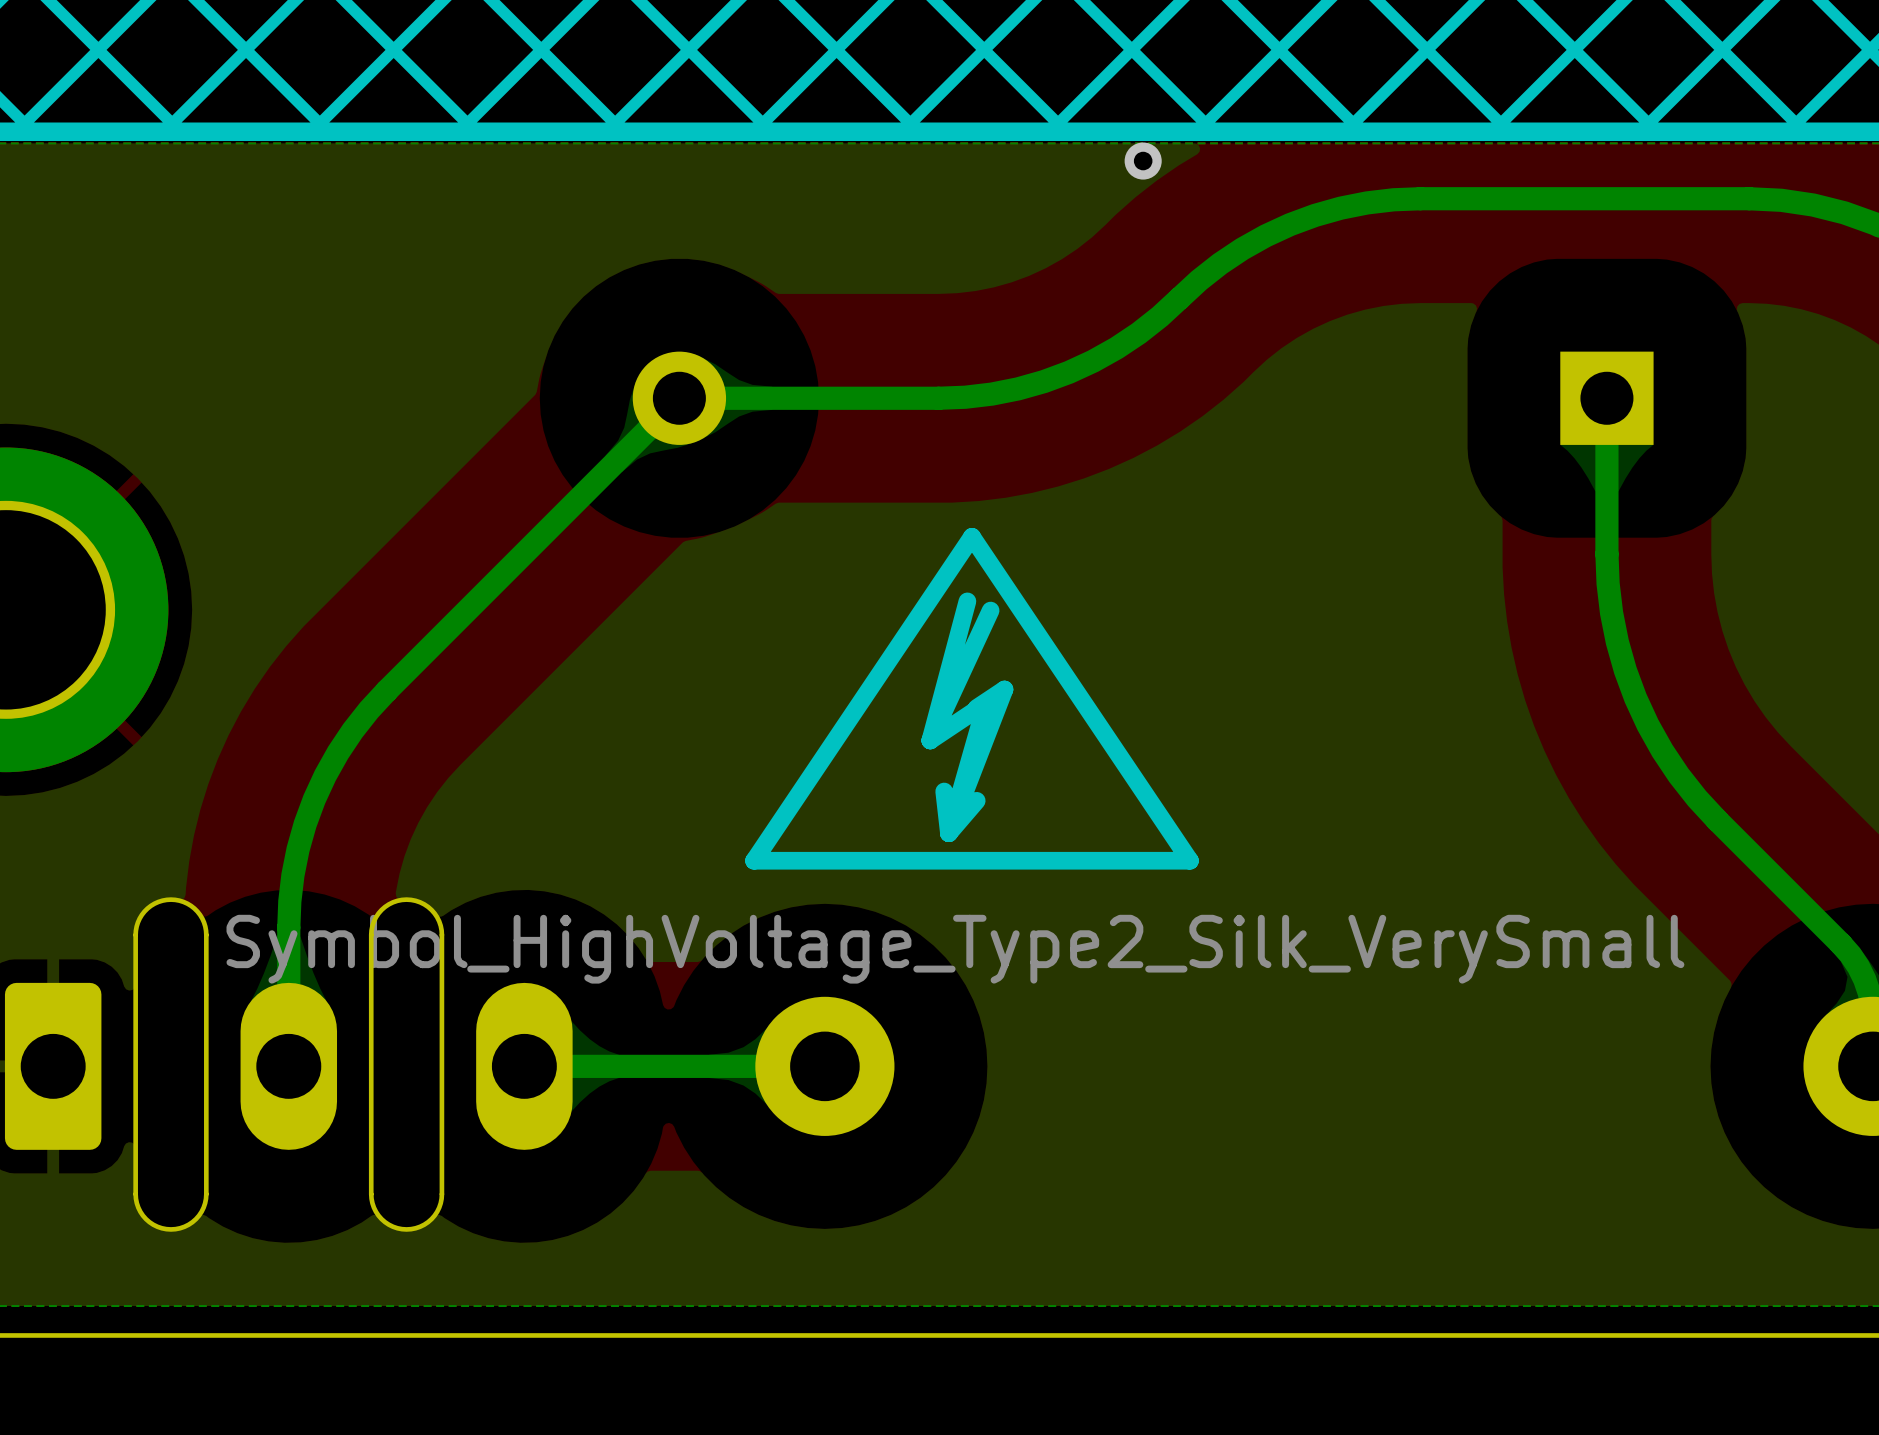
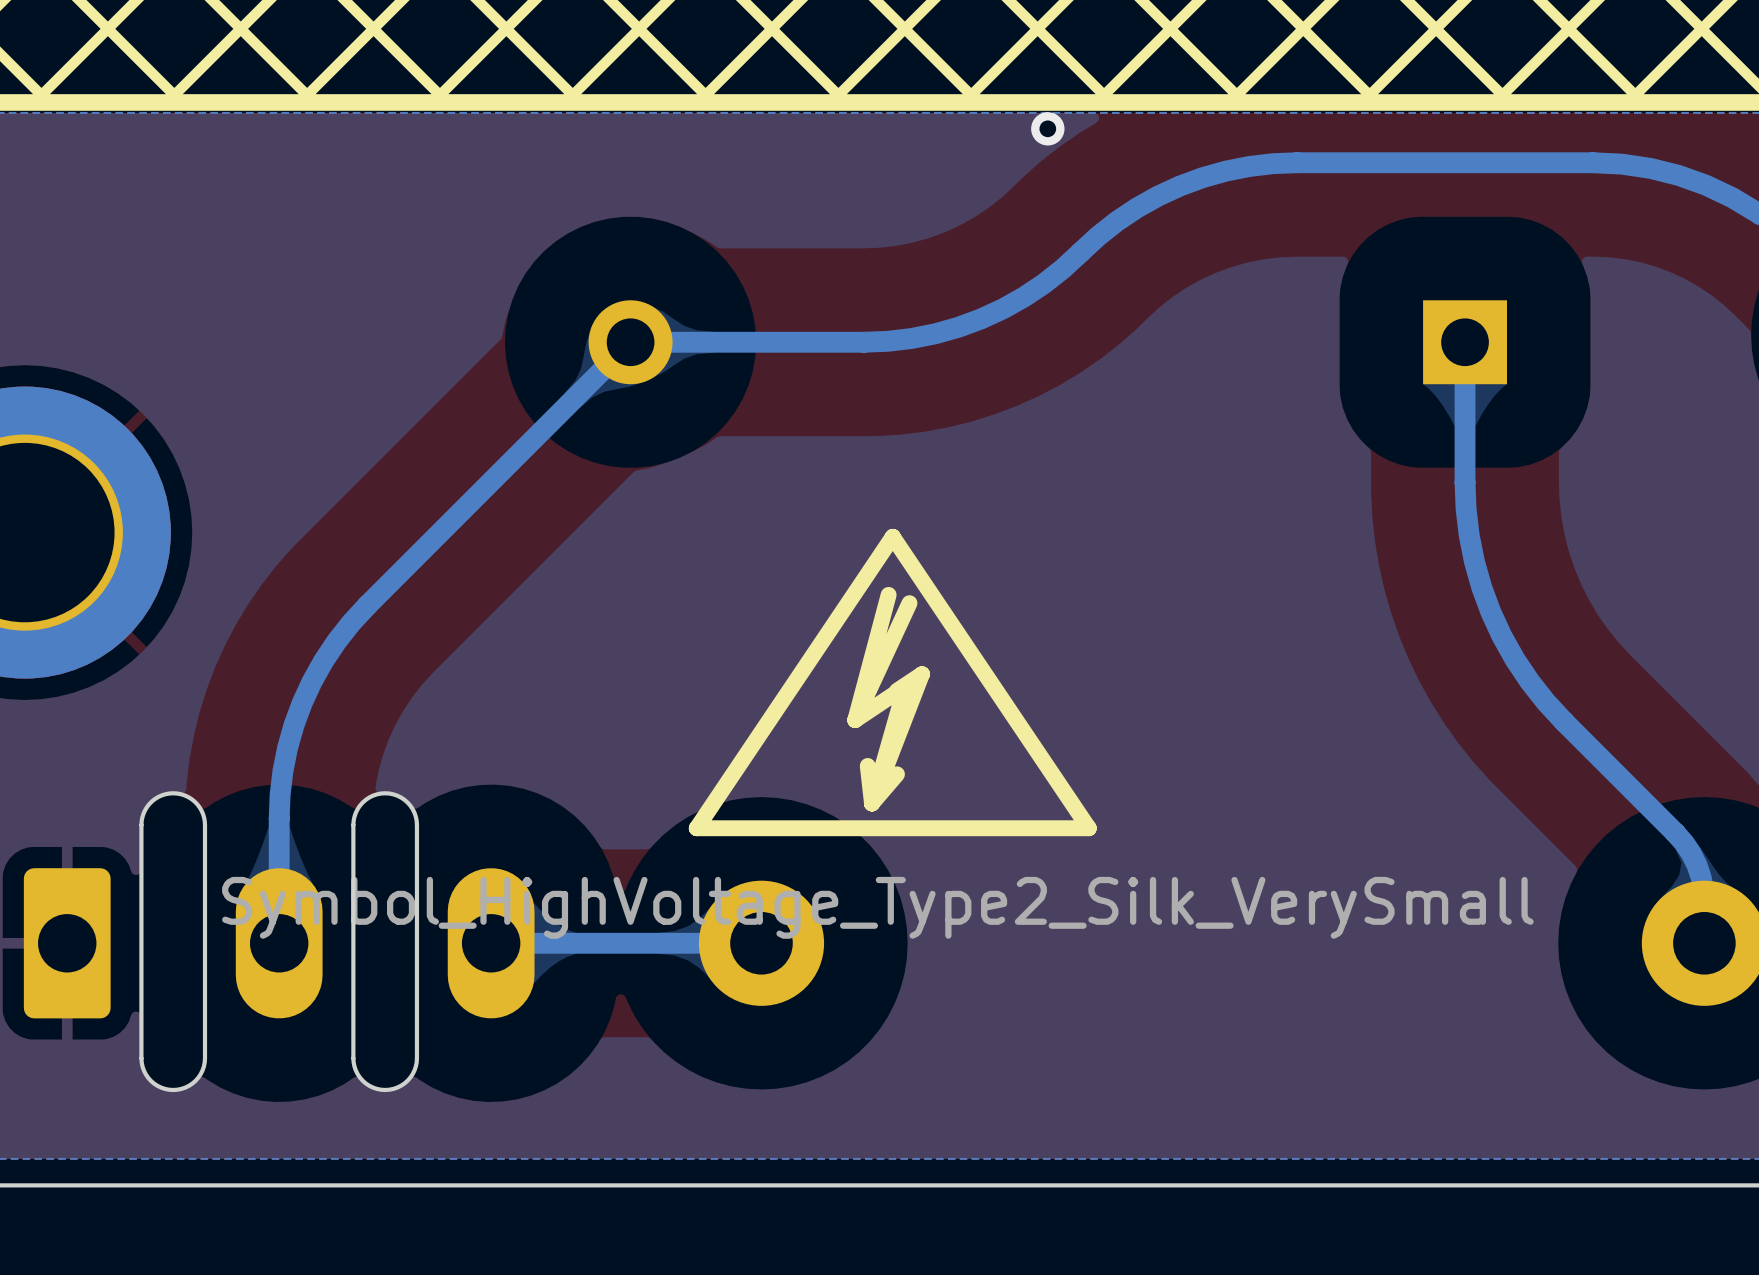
drawing position: (972, 698) -> (892, 682)

